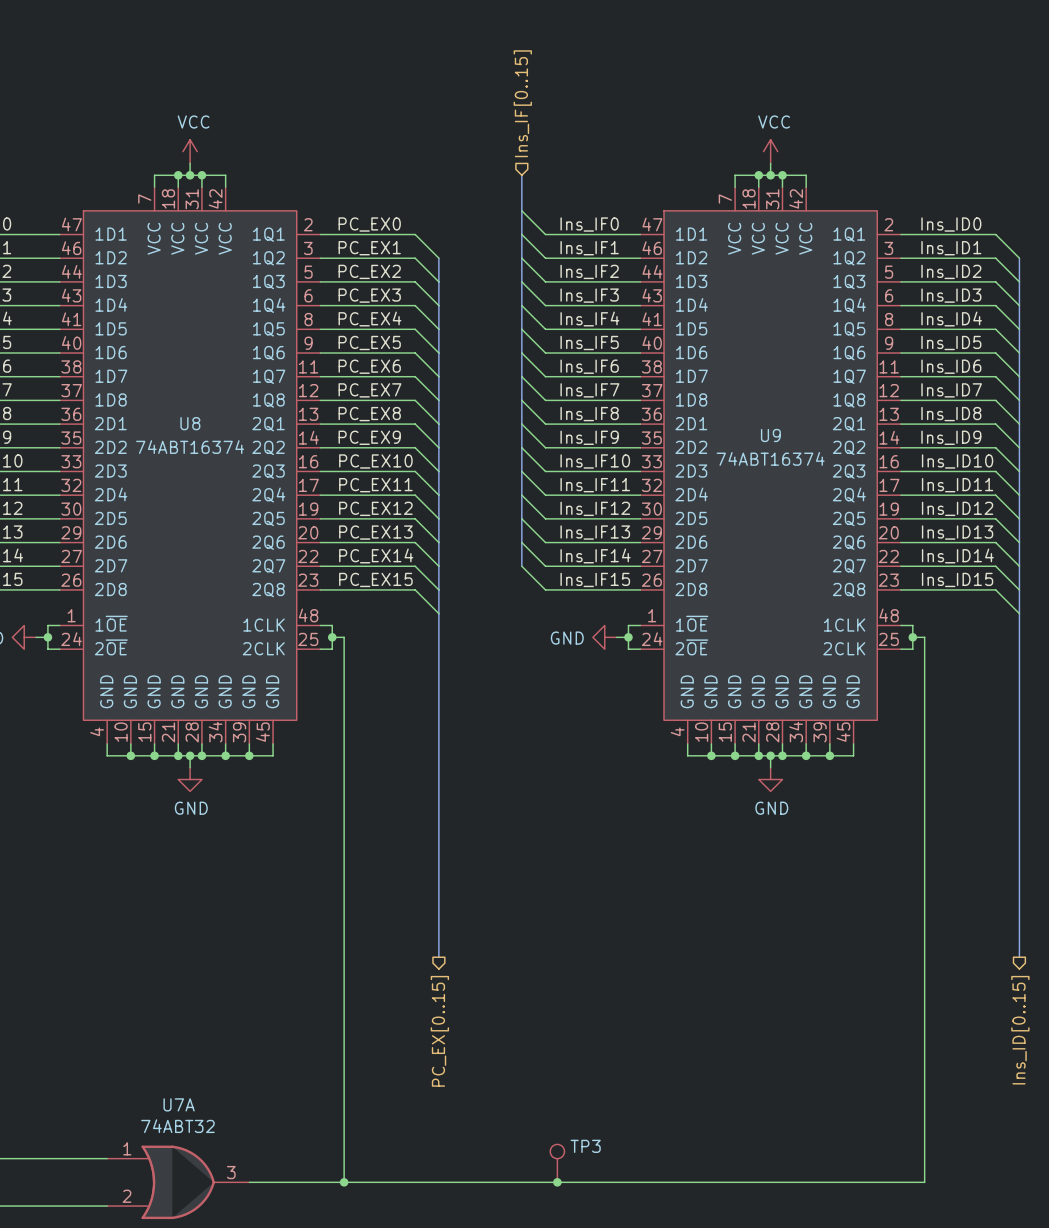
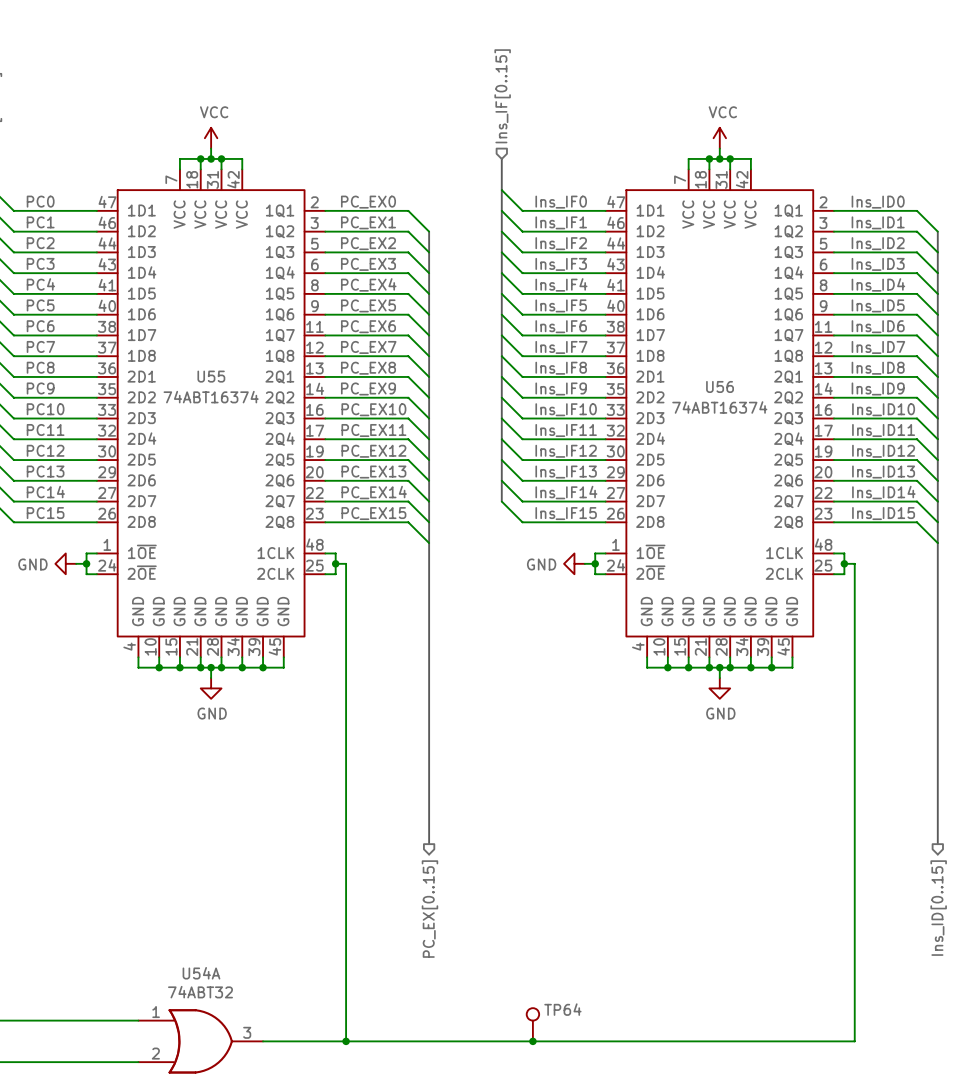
U8 name: U8 (190, 423) -> U55 (211, 376)
U9 name: U9 (770, 435) -> U56 (720, 386)
U7A name: U7A (179, 1104) -> U54A (201, 973)
TP3 name: TP3 (585, 1146) -> TP64 (562, 1009)

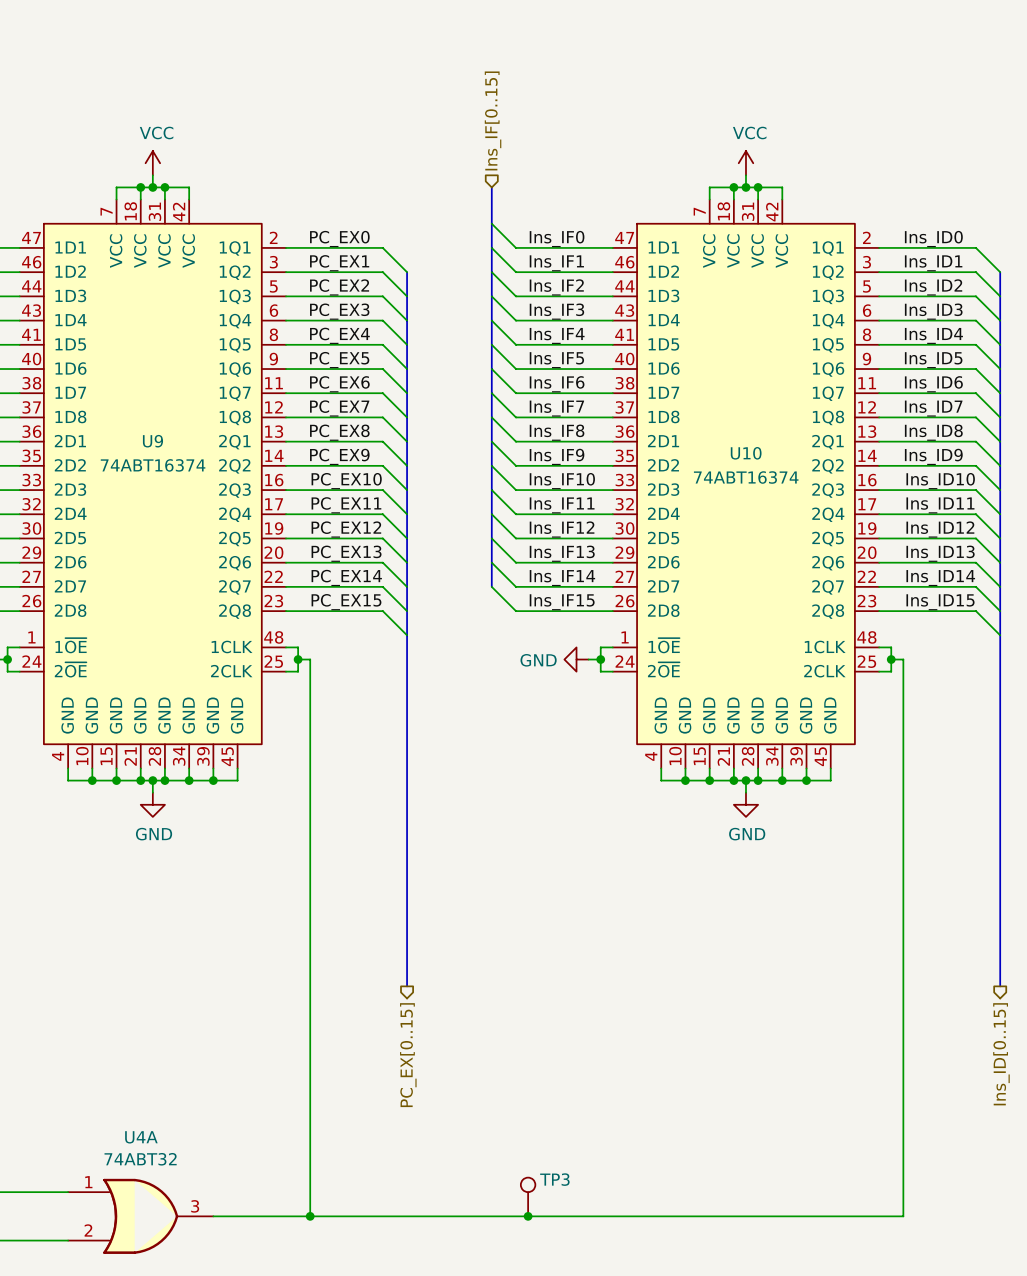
U55 name: U55 (211, 376) -> U9 (152, 441)
U56 name: U56 (720, 386) -> U10 (746, 453)
U54A name: U54A (201, 973) -> U4A (141, 1137)
TP64 name: TP64 (562, 1009) -> TP3 (554, 1179)

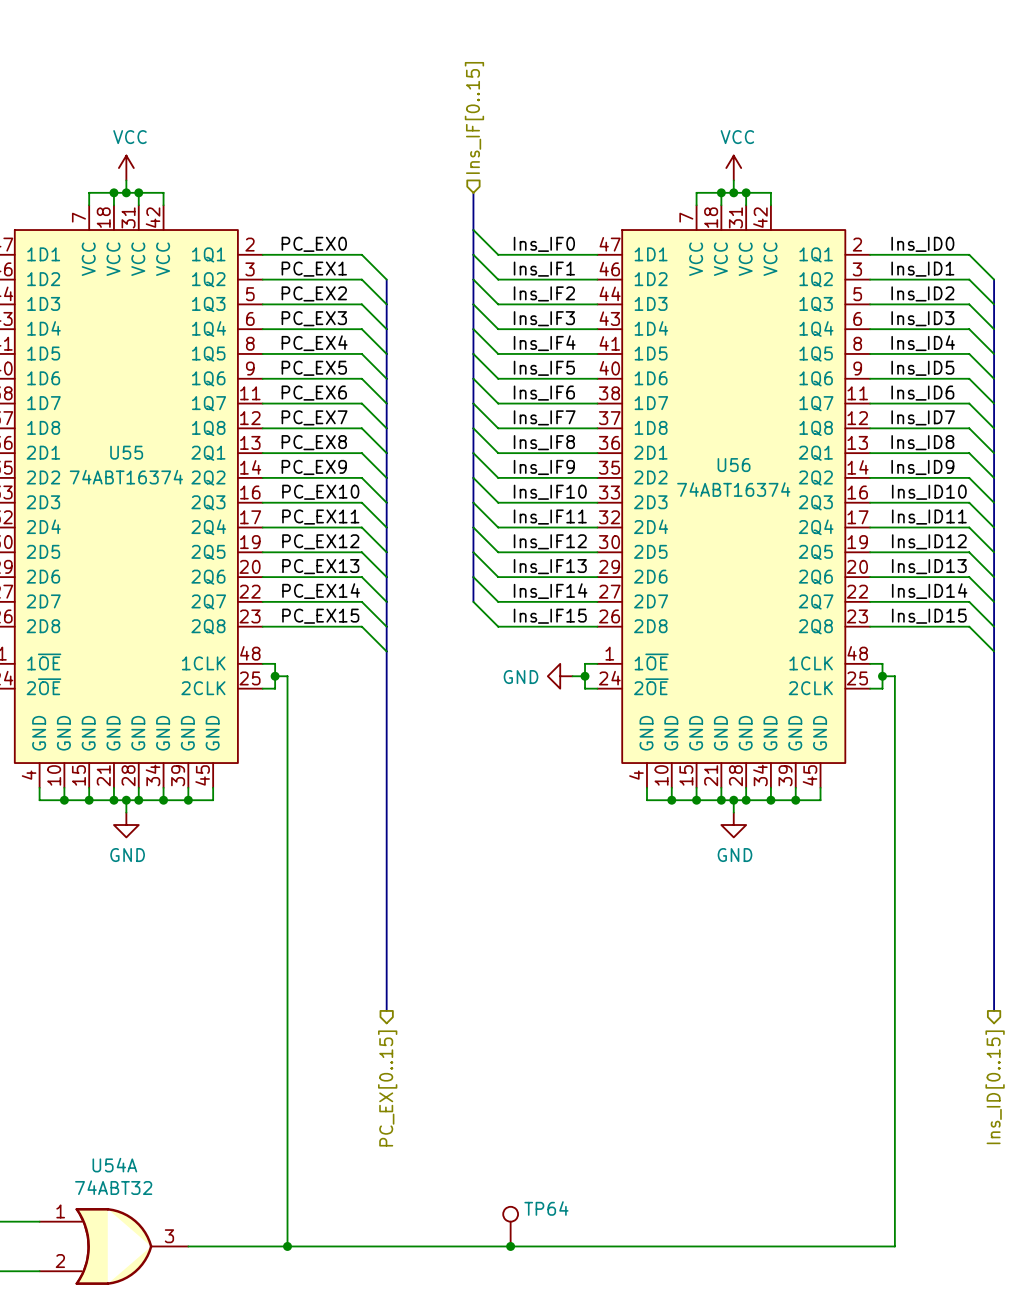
U9 name: U9 (152, 441) -> U55 (126, 452)
U10 name: U10 (746, 453) -> U56 (734, 465)
U4A name: U4A (141, 1137) -> U54A (114, 1165)
TP3 name: TP3 (554, 1179) -> TP64 (546, 1208)

